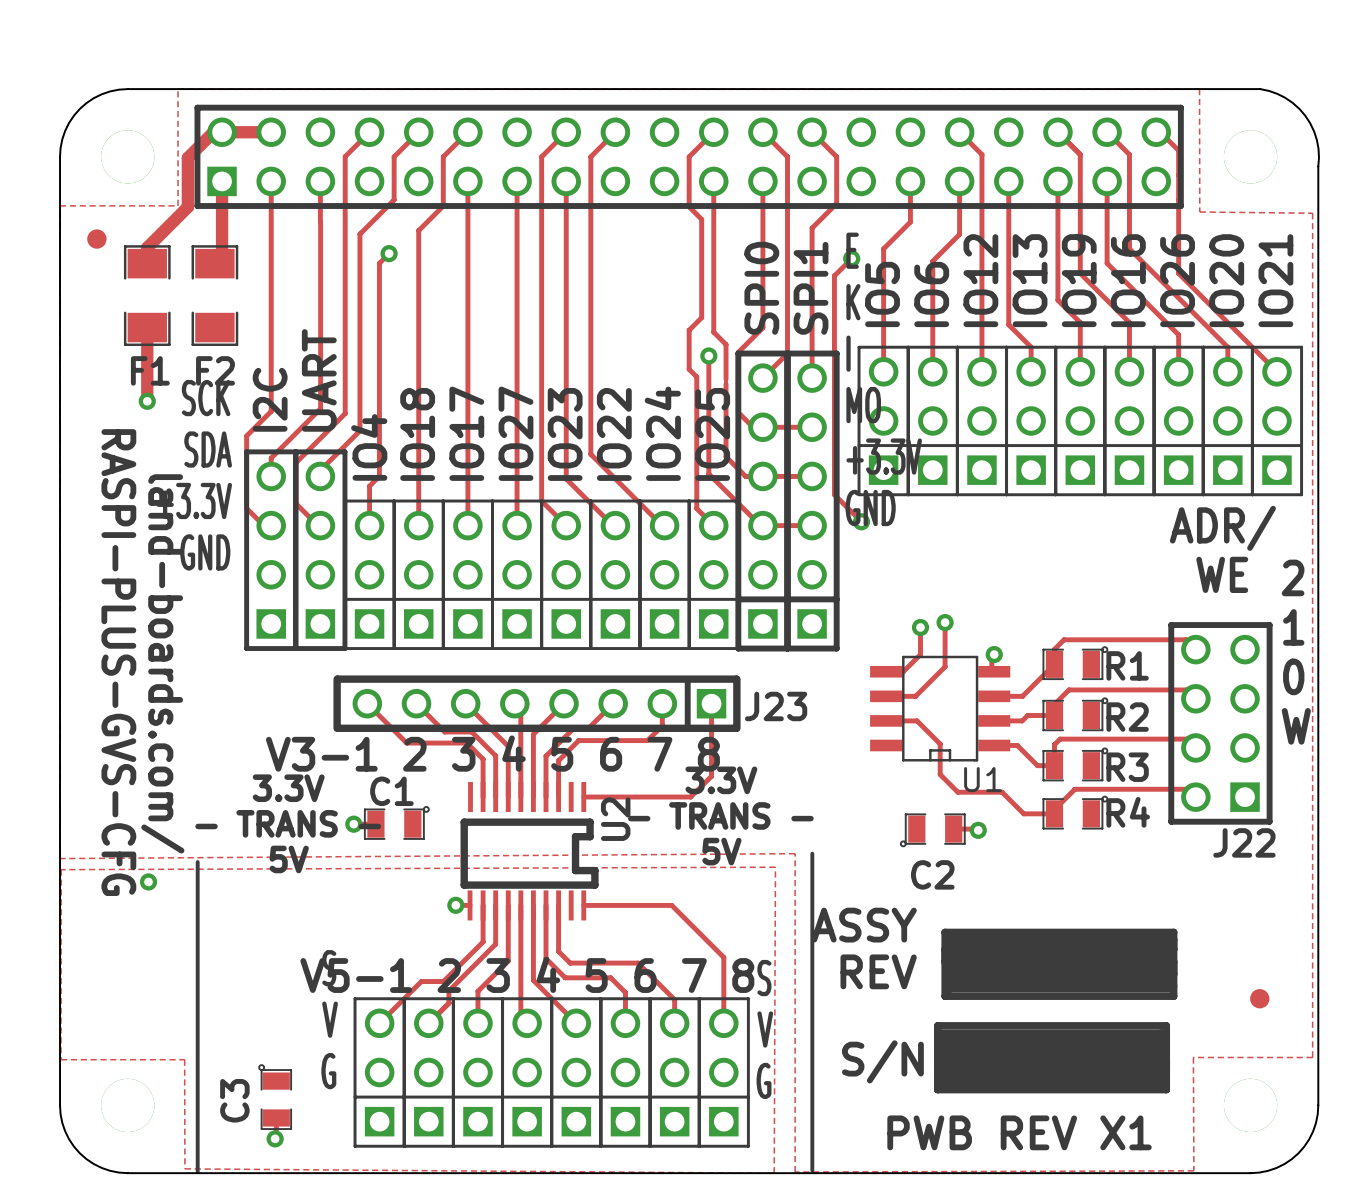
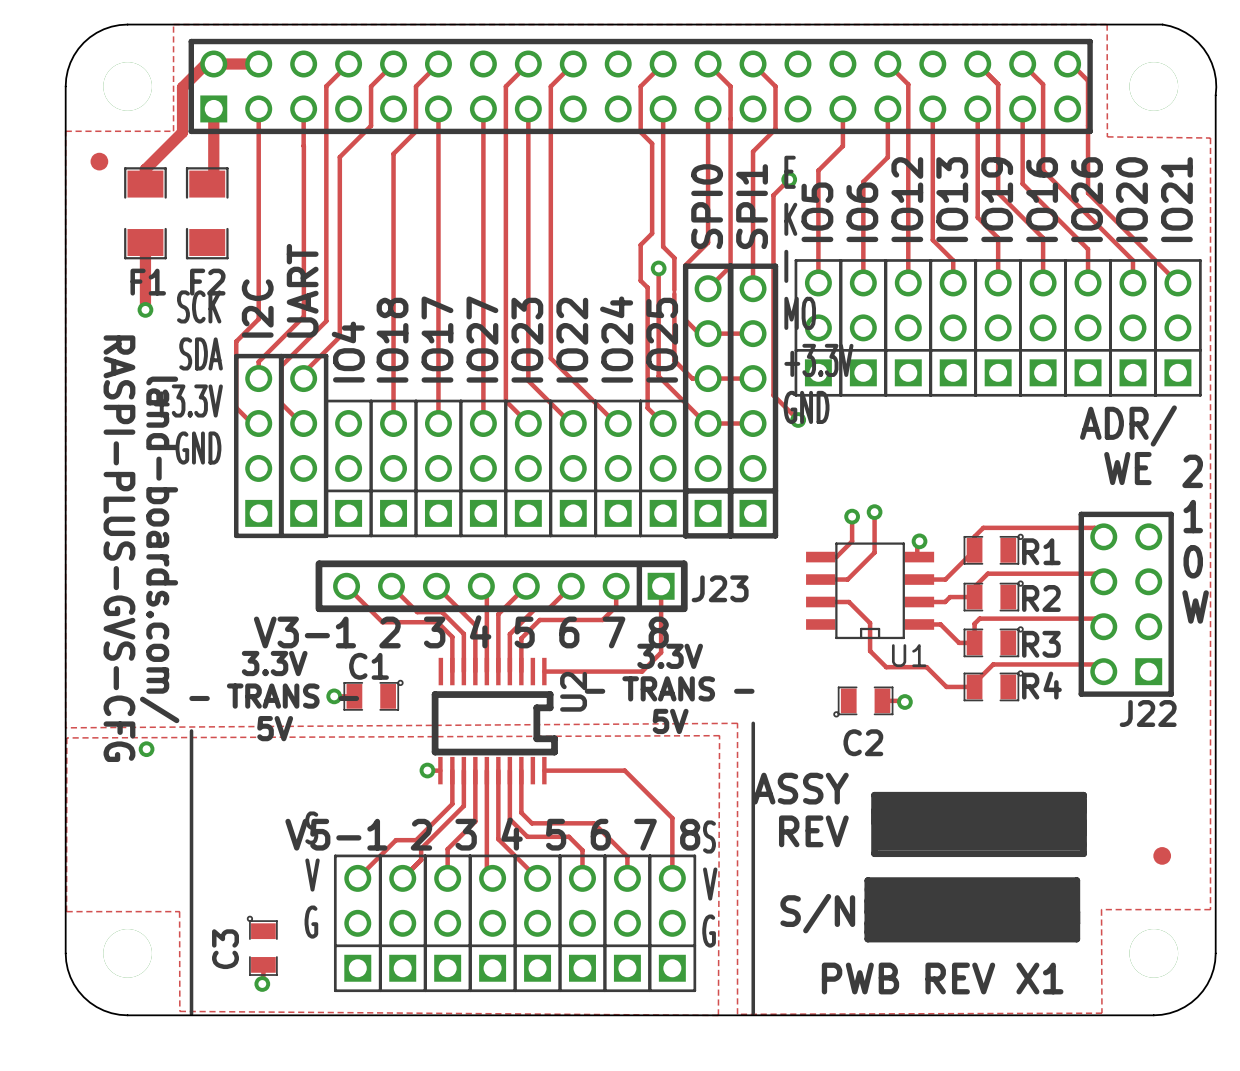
track: (389, 253) (379, 263) (379, 476) (369, 486) (369, 525) -> none
via: (389, 253) -> none

